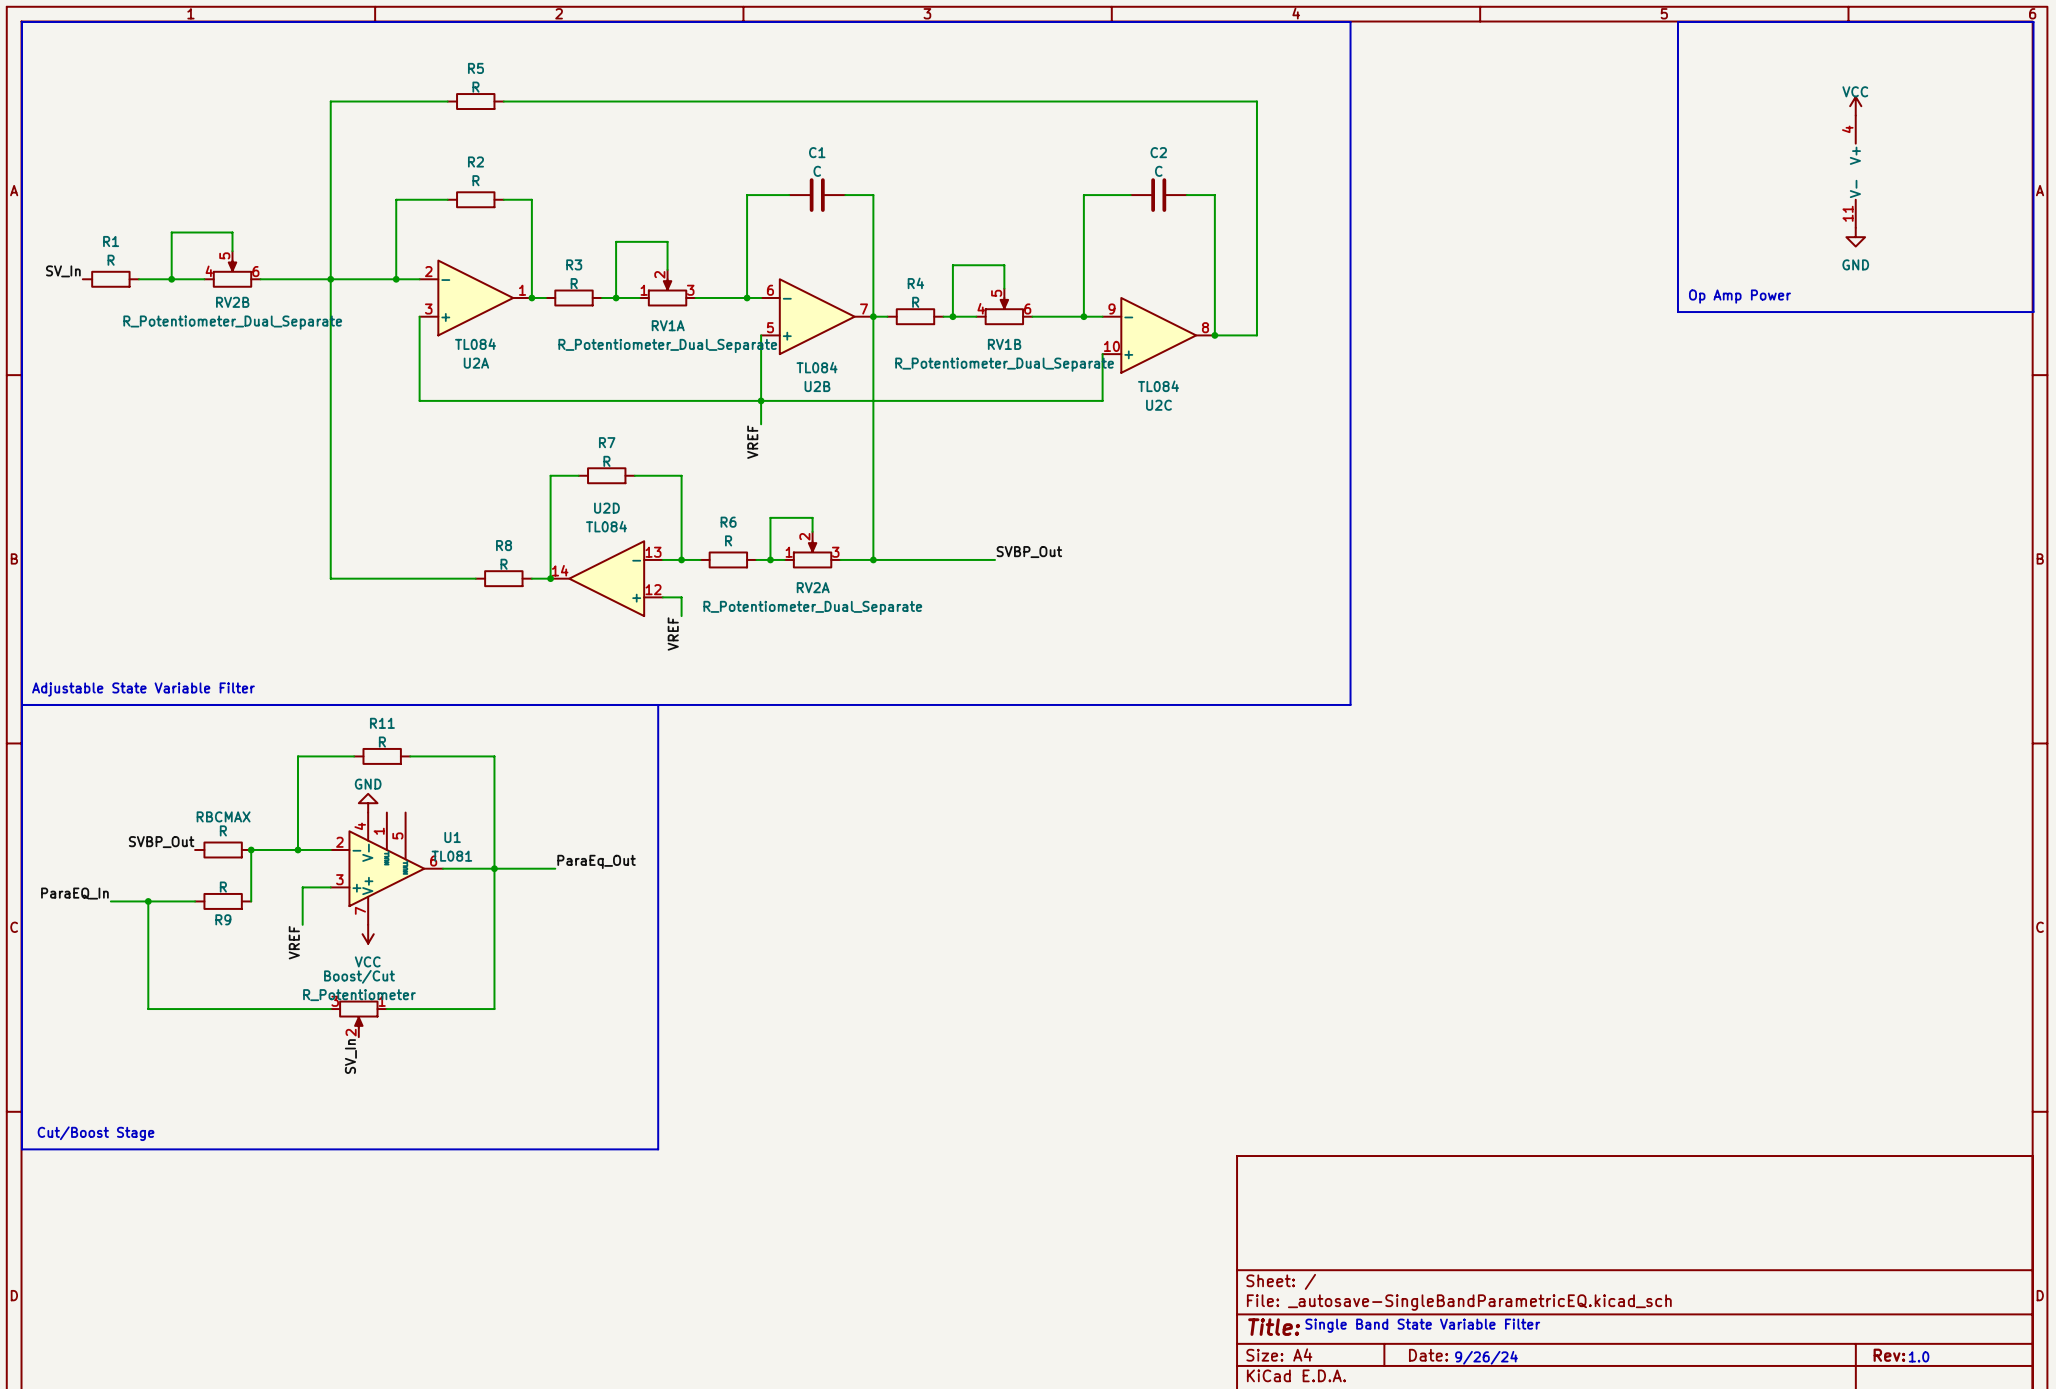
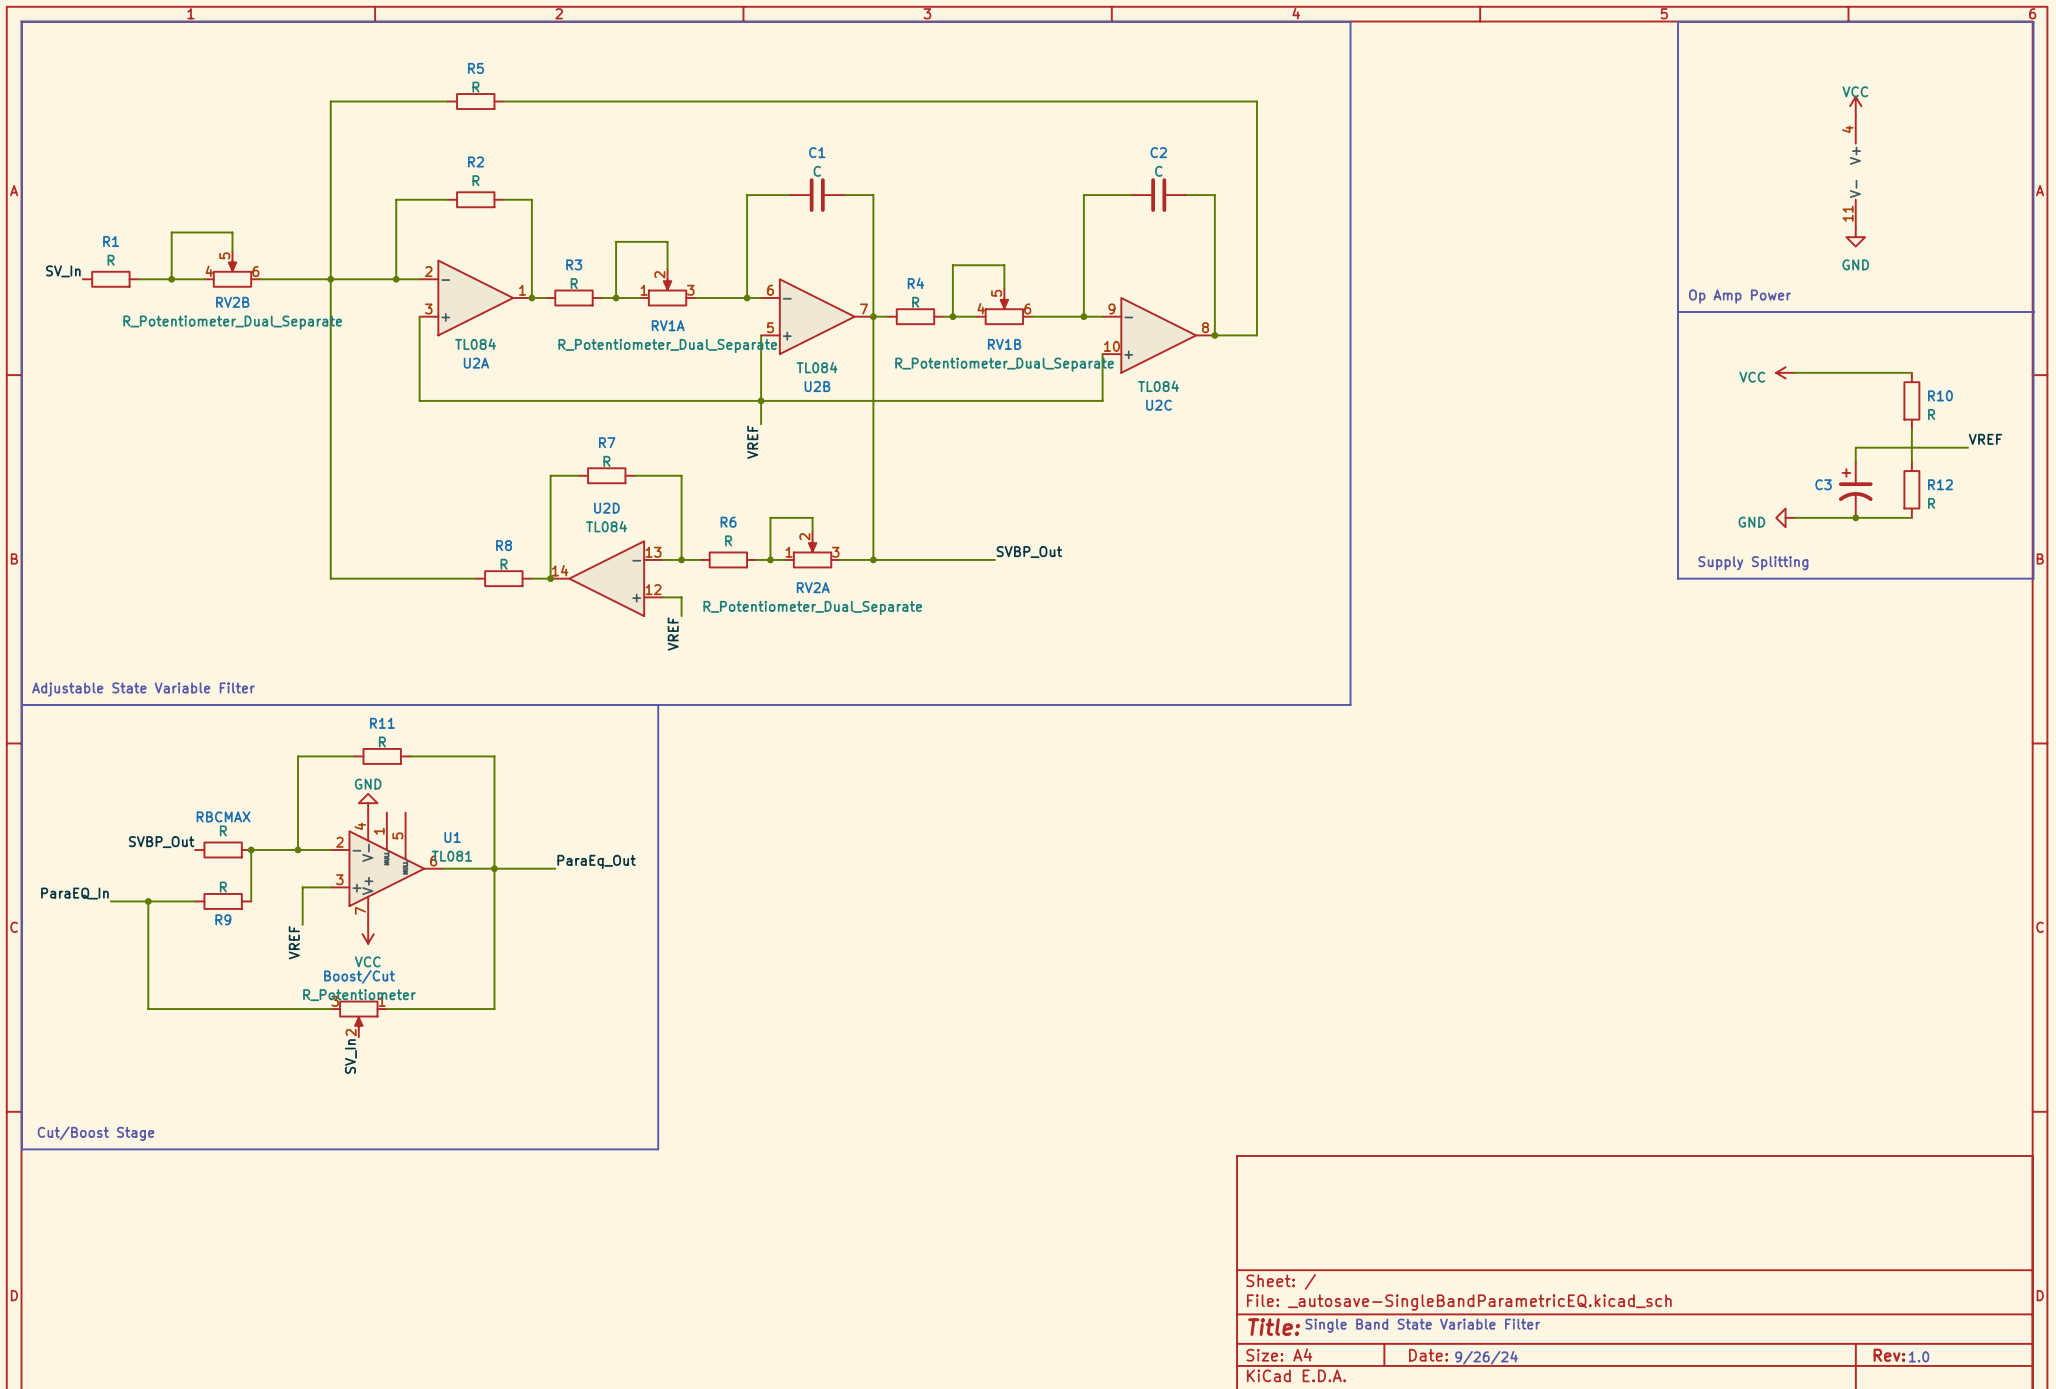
line: none -> (1677, 312) (1677, 578) (2033, 578) (2033, 312)
power symbol: none -> VCC (1785, 372)
wire: none -> (1794, 372) (1911, 372)
R10: none -> R (1911, 400)
wire: none -> (1911, 428) (1911, 461)
label: none -> VREF (1985, 439)
wire: none -> (1968, 447) (1855, 447) (1855, 461)
C3: none -> (1855, 489)
R12: none -> R (1911, 489)
power symbol: none -> GND (1785, 517)
wire: none -> (1794, 517) (1911, 517)
junction: none -> (1855, 517)
text: none -> Supply Splitting (1753, 563)

